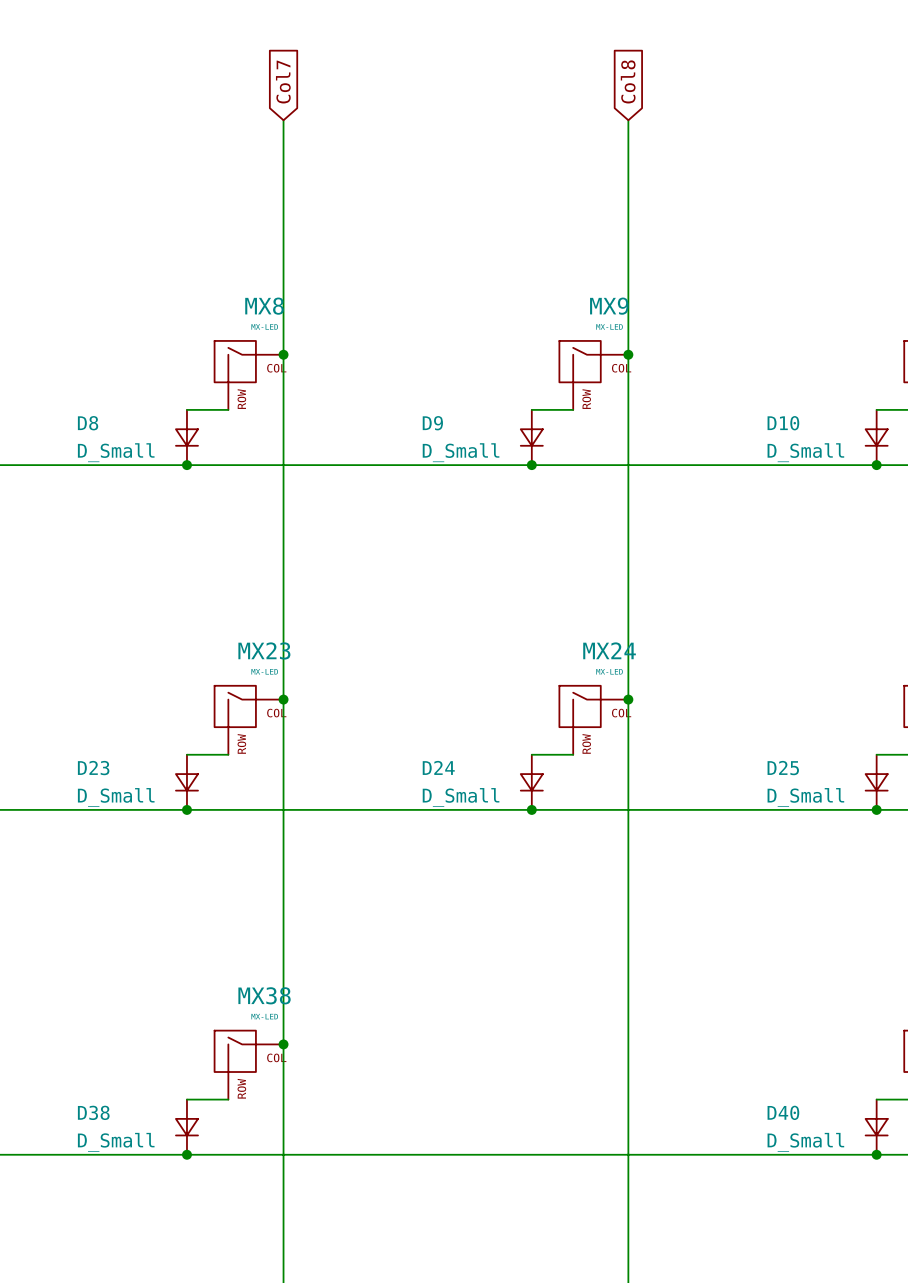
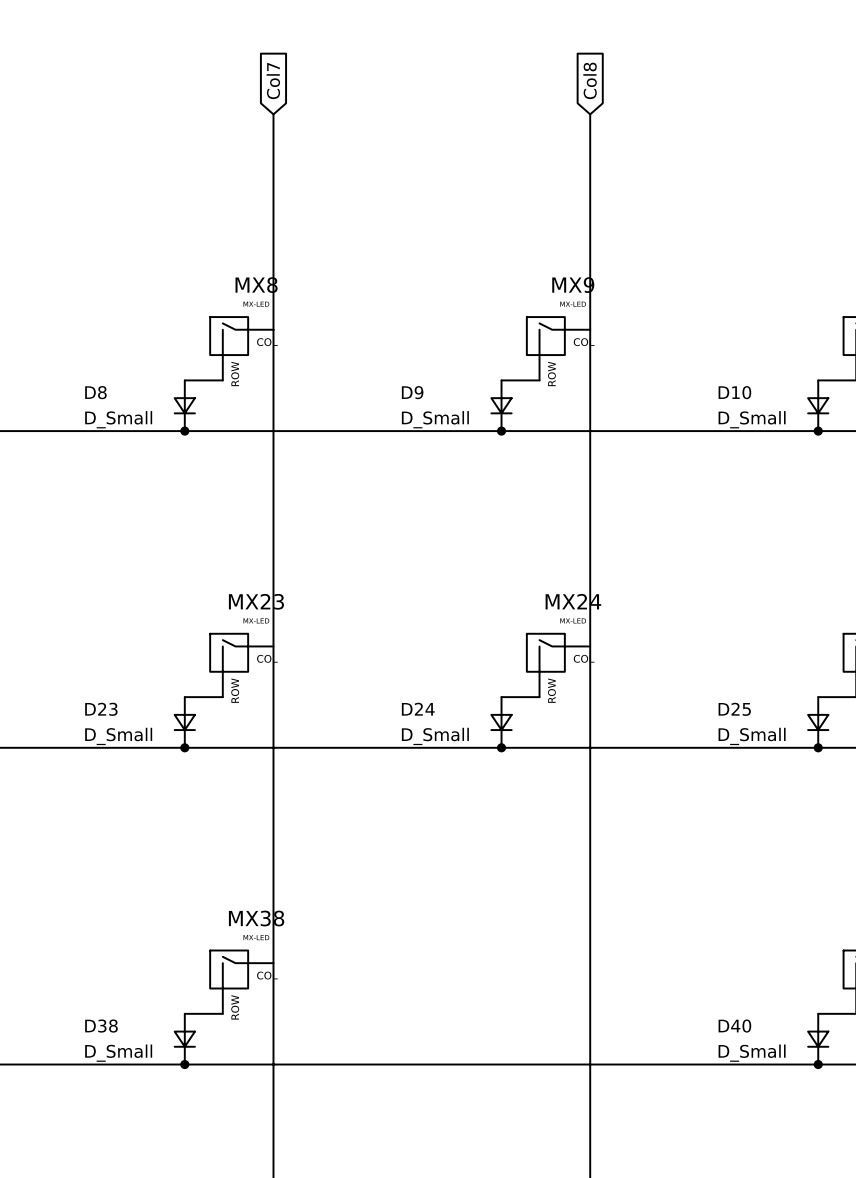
junction: (283, 354) -> none
junction: (628, 354) -> none
junction: (283, 699) -> none
junction: (628, 699) -> none
junction: (283, 1044) -> none

